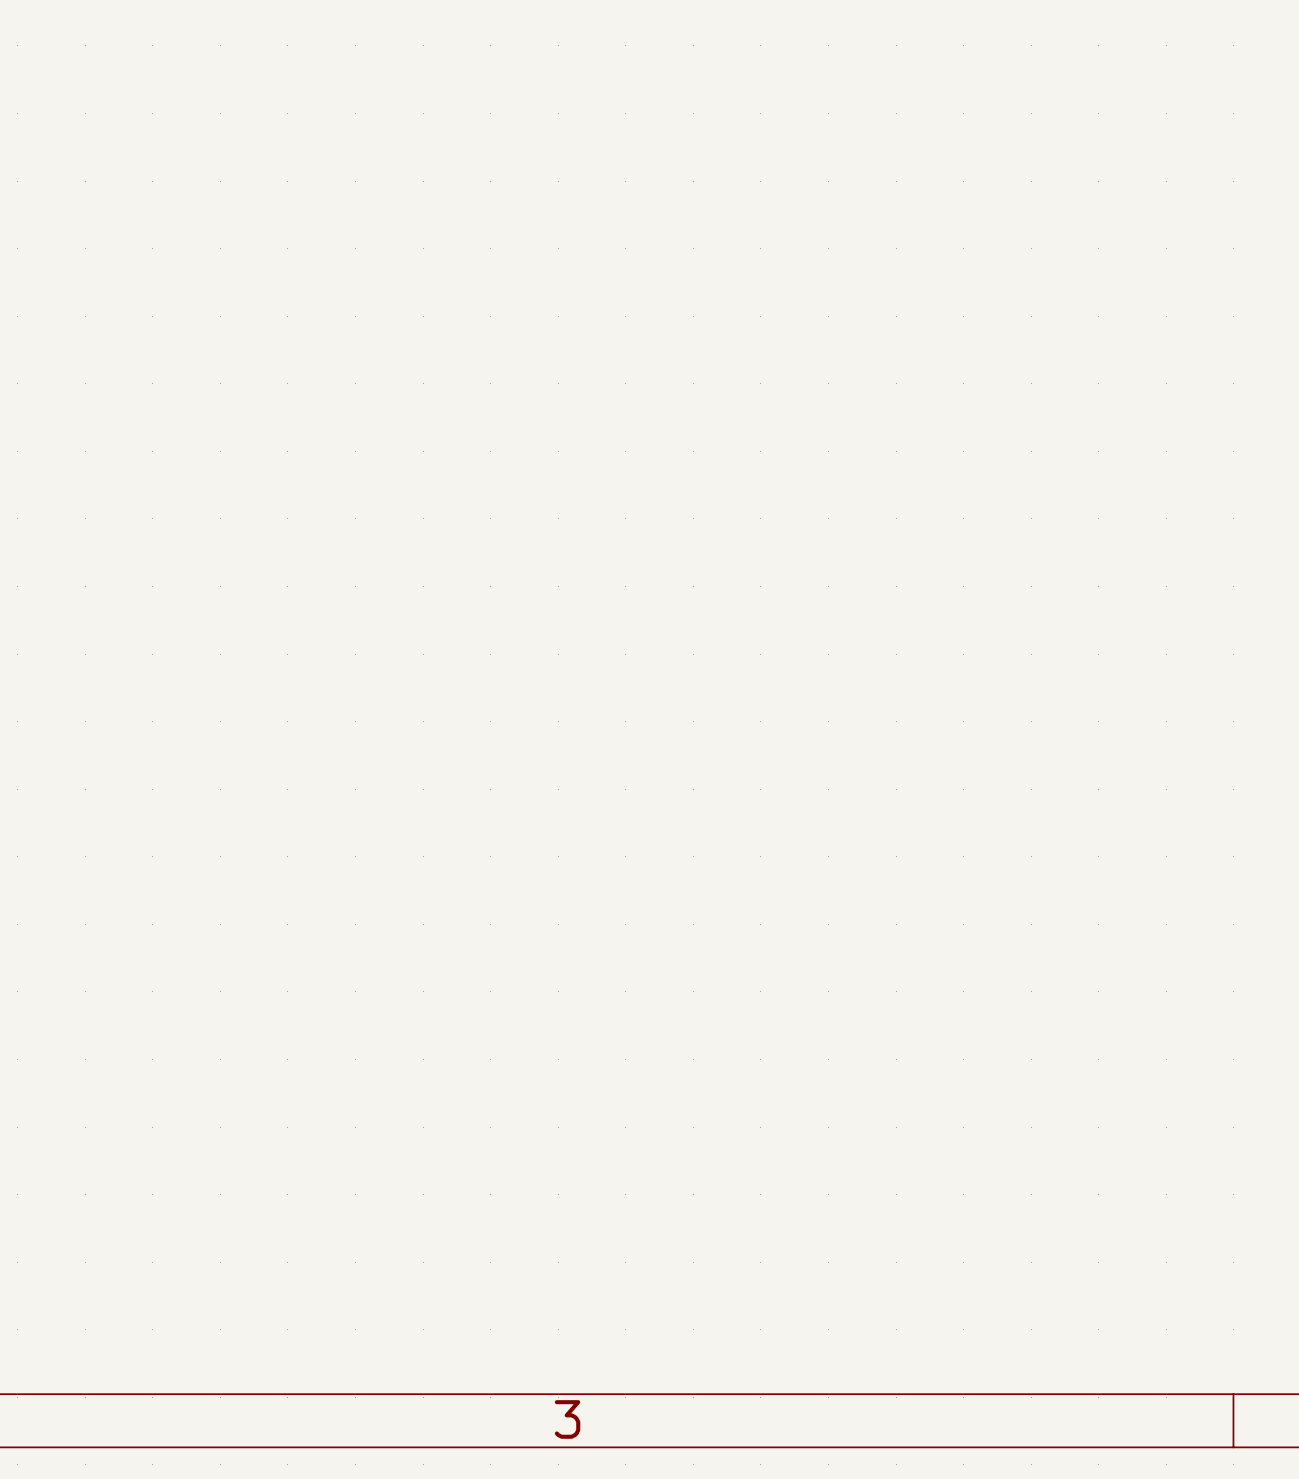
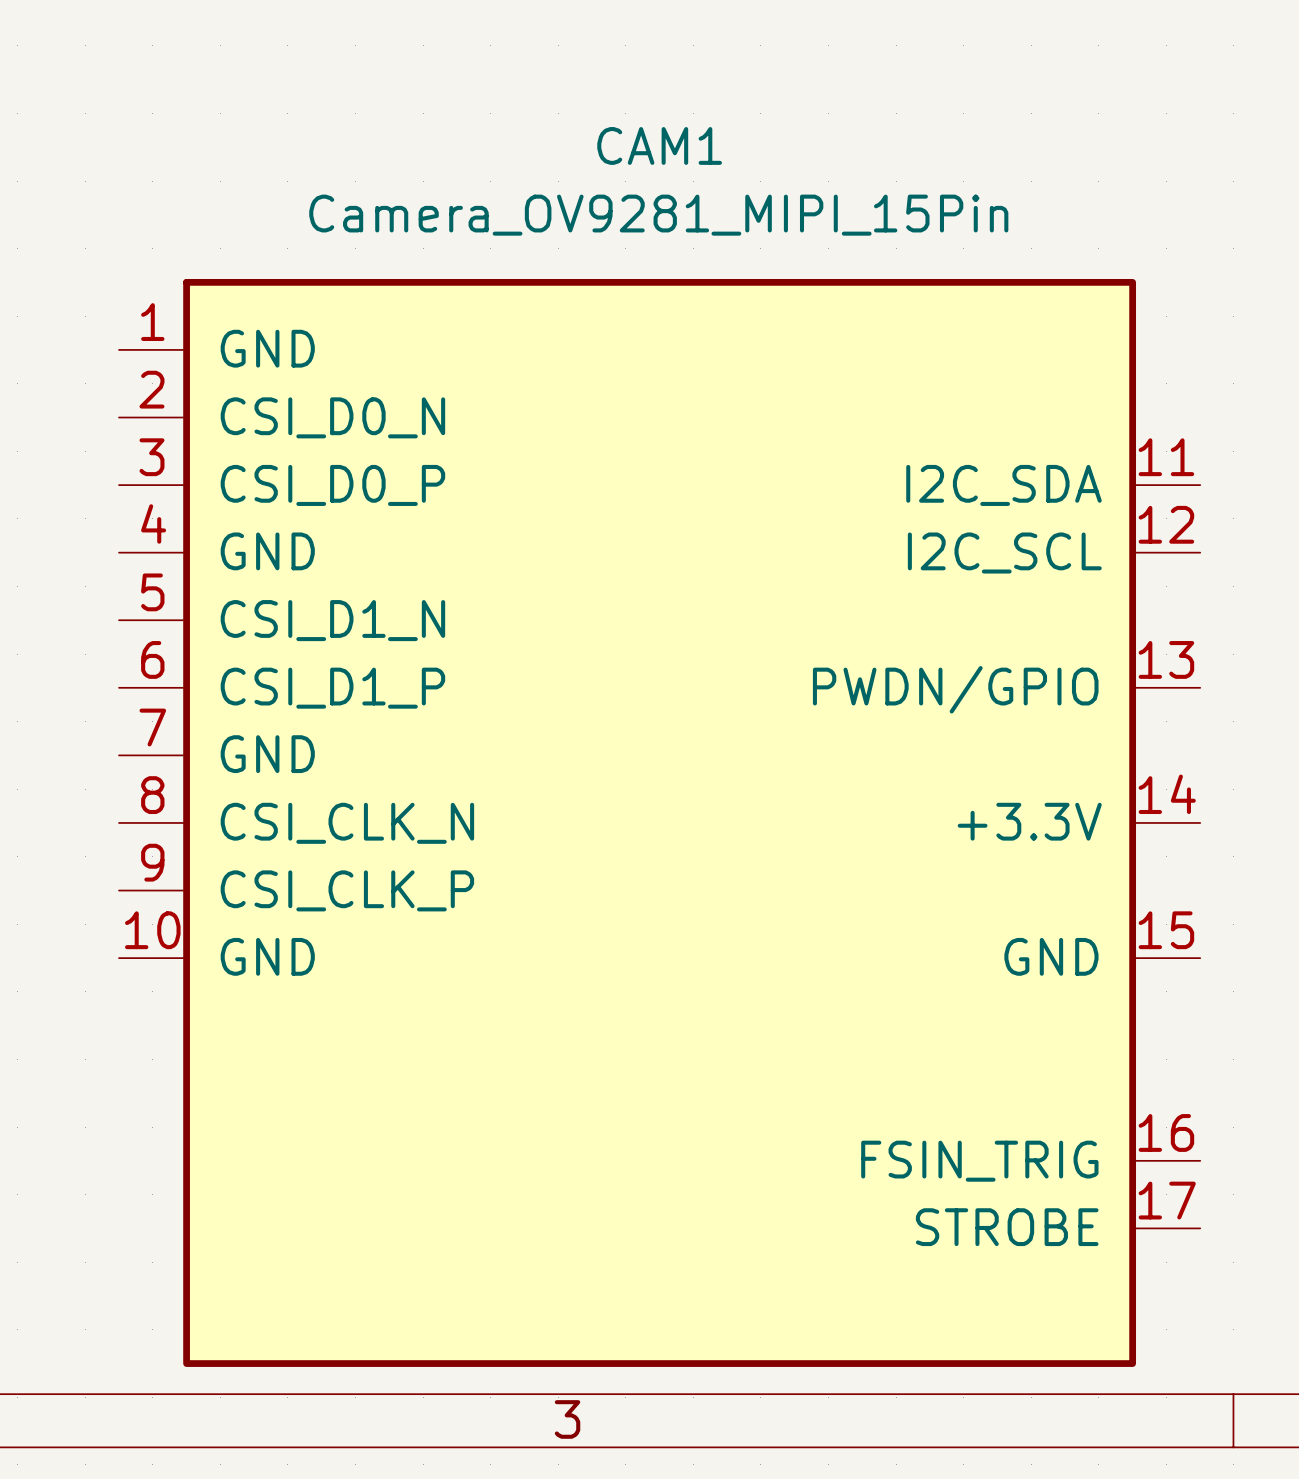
CAM1: none -> Camera_OV9281_MIPI_15Pin (659, 822)

